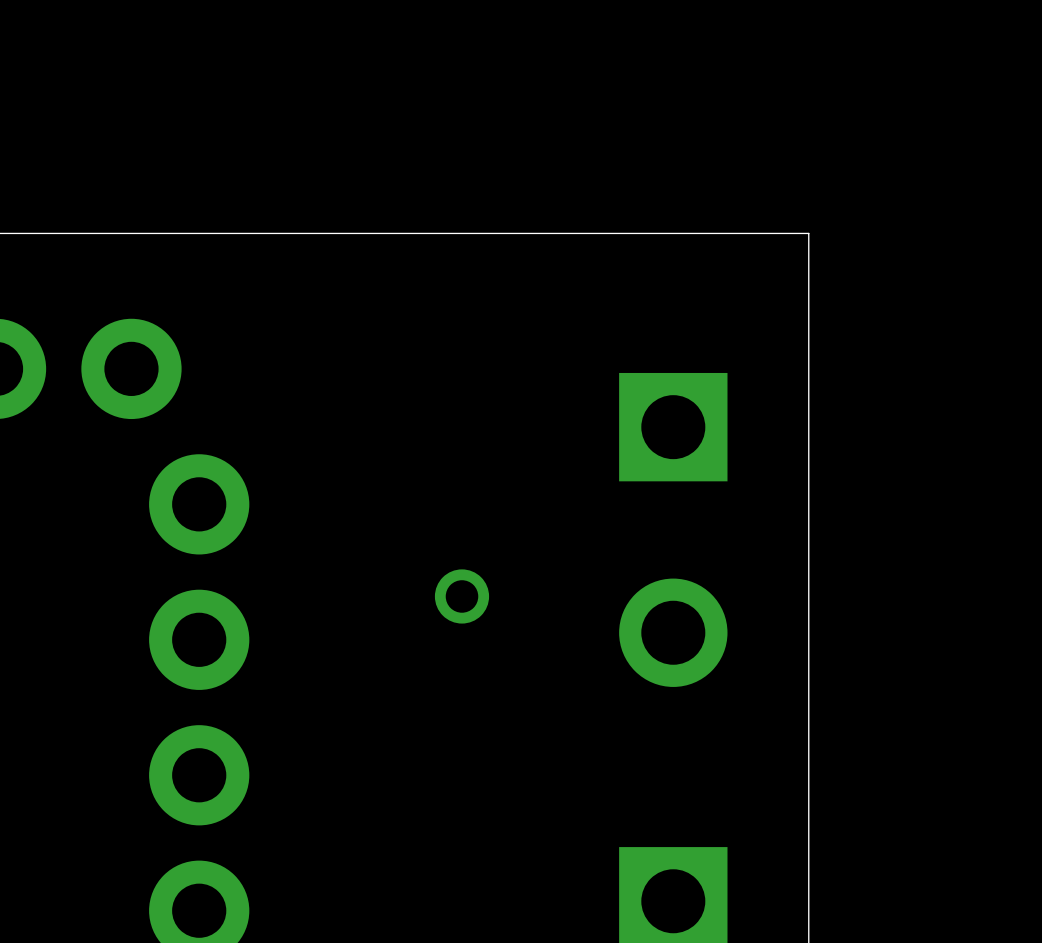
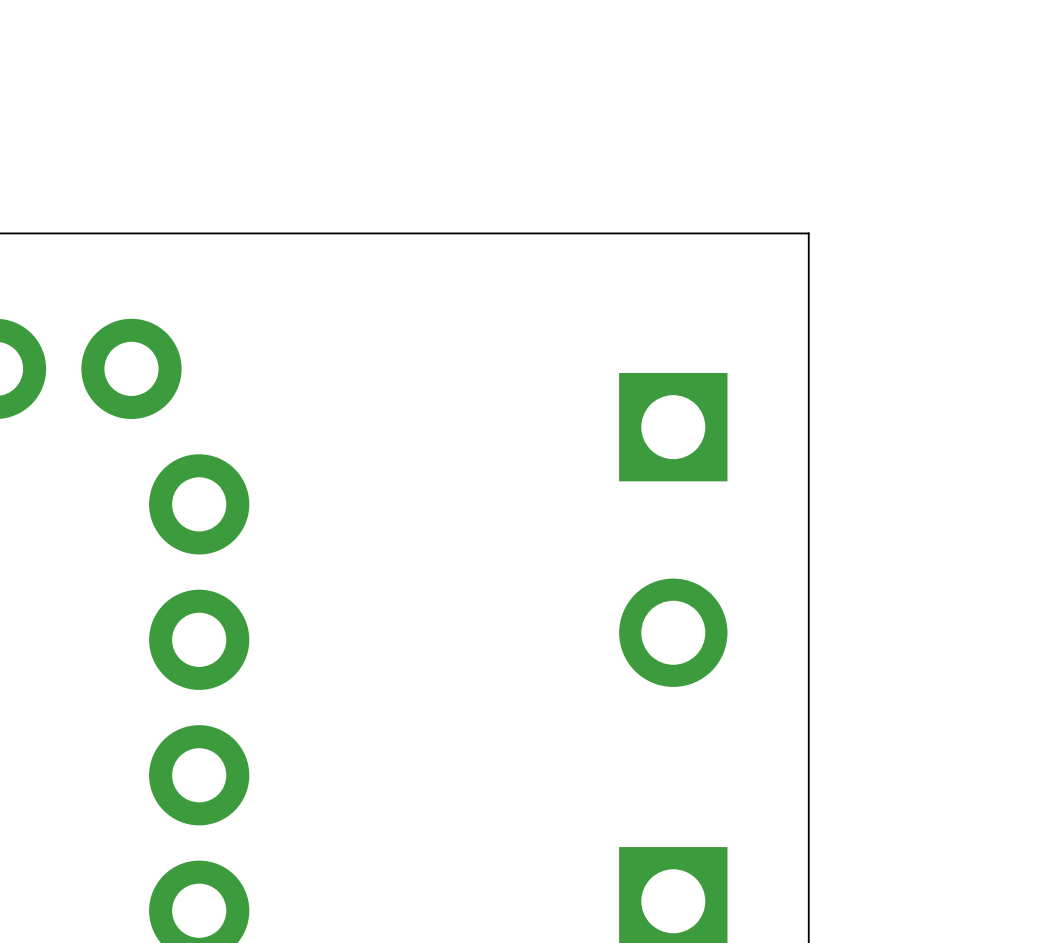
via: (461, 596) -> none

